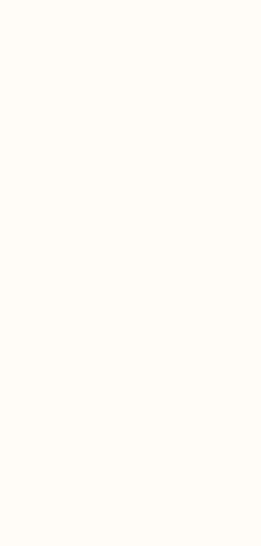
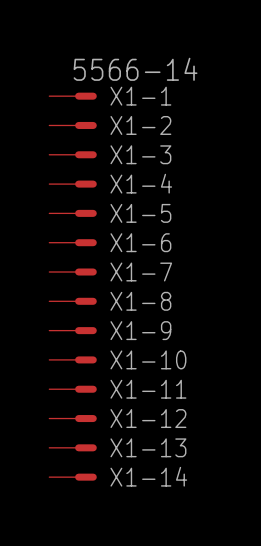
X1-1: none -> 5566-14 (73, 96)
X1-2: none -> (73, 125)
X1-3: none -> (73, 154)
X1-4: none -> (73, 184)
X1-5: none -> (73, 213)
X1-6: none -> (73, 242)
X1-7: none -> (73, 272)
X1-8: none -> (73, 301)
X1-9: none -> (73, 330)
X1-10: none -> (73, 359)
X1-11: none -> (73, 389)
X1-12: none -> (73, 418)
X1-13: none -> (73, 447)
X1-14: none -> (73, 477)

